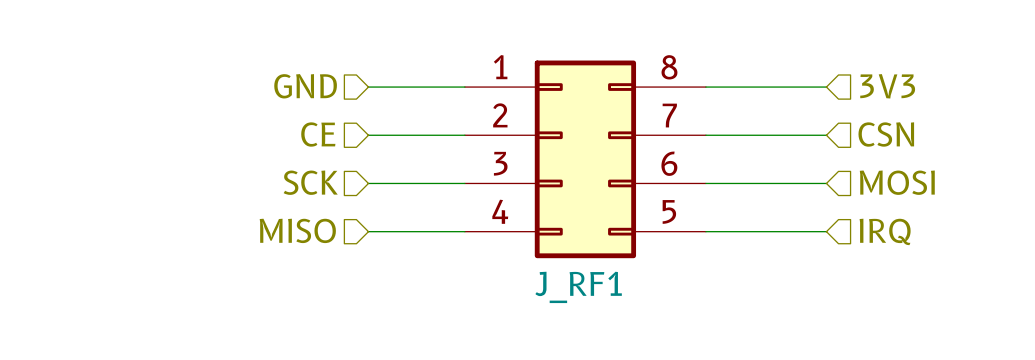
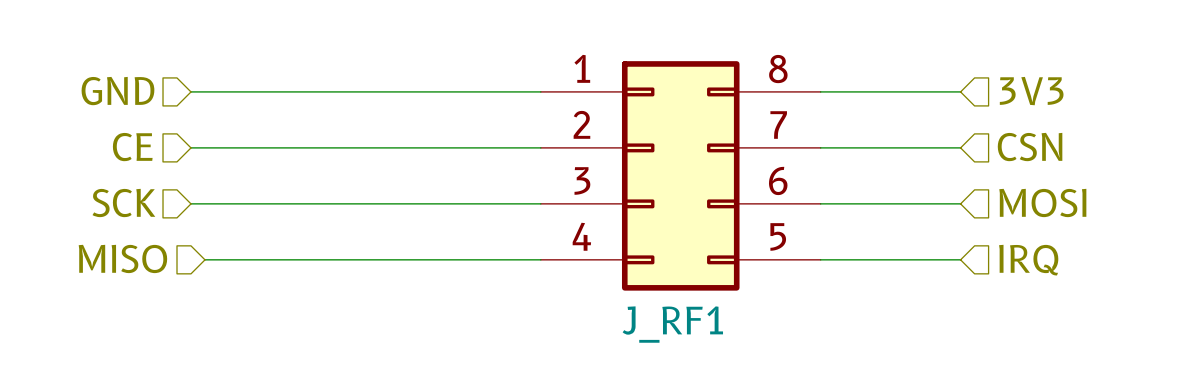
hierarchical label position: GND (305, 86) -> GND (117, 91)
wire: none -> (190, 91) (428, 91)
hierarchical label position: CE (318, 134) -> CE (132, 147)
wire: none -> (190, 147) (428, 147)
hierarchical label position: SCK (310, 182) -> SCK (123, 202)
wire: none -> (190, 203) (428, 203)
hierarchical label position: MISO (297, 230) -> MISO (122, 258)
wire: none -> (204, 259) (428, 259)

